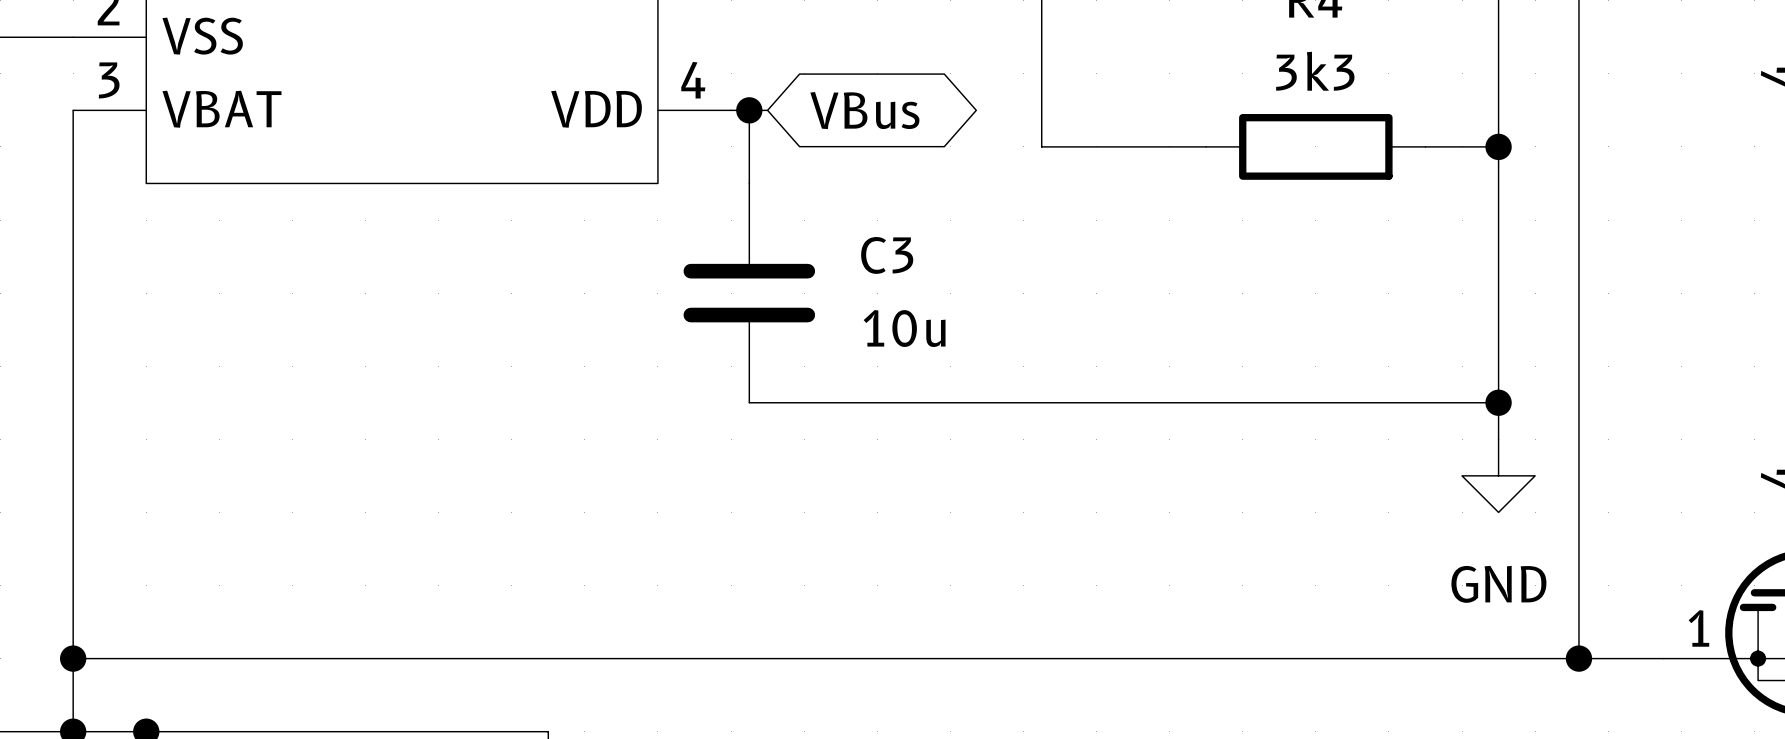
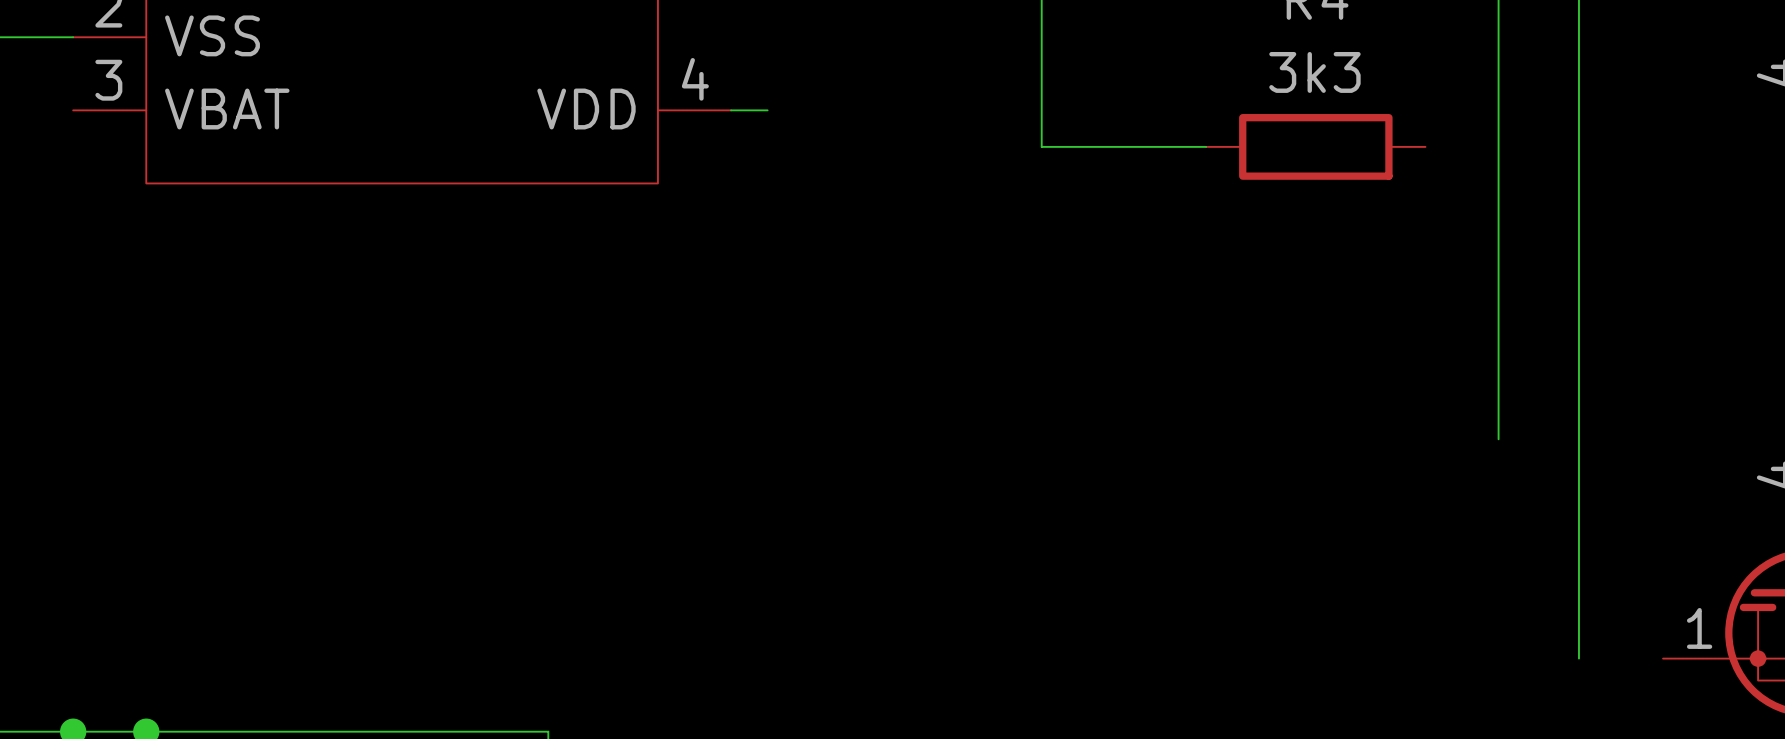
wire: (73, 110) (73, 731) -> none
wire: (749, 110) (749, 183) -> none
junction: (749, 110) -> none
global label: VBus (864, 110) -> none
wire: (1425, 146) (1498, 146) -> none
junction: (1498, 146) -> none
C3: 10u (749, 293) -> none
wire: (749, 402) (1498, 402) -> none
junction: (1498, 402) -> none
power symbol: GND (1498, 475) -> none
wire: (73, 658) (1663, 658) -> none
junction: (73, 658) -> none
junction: (1578, 658) -> none

